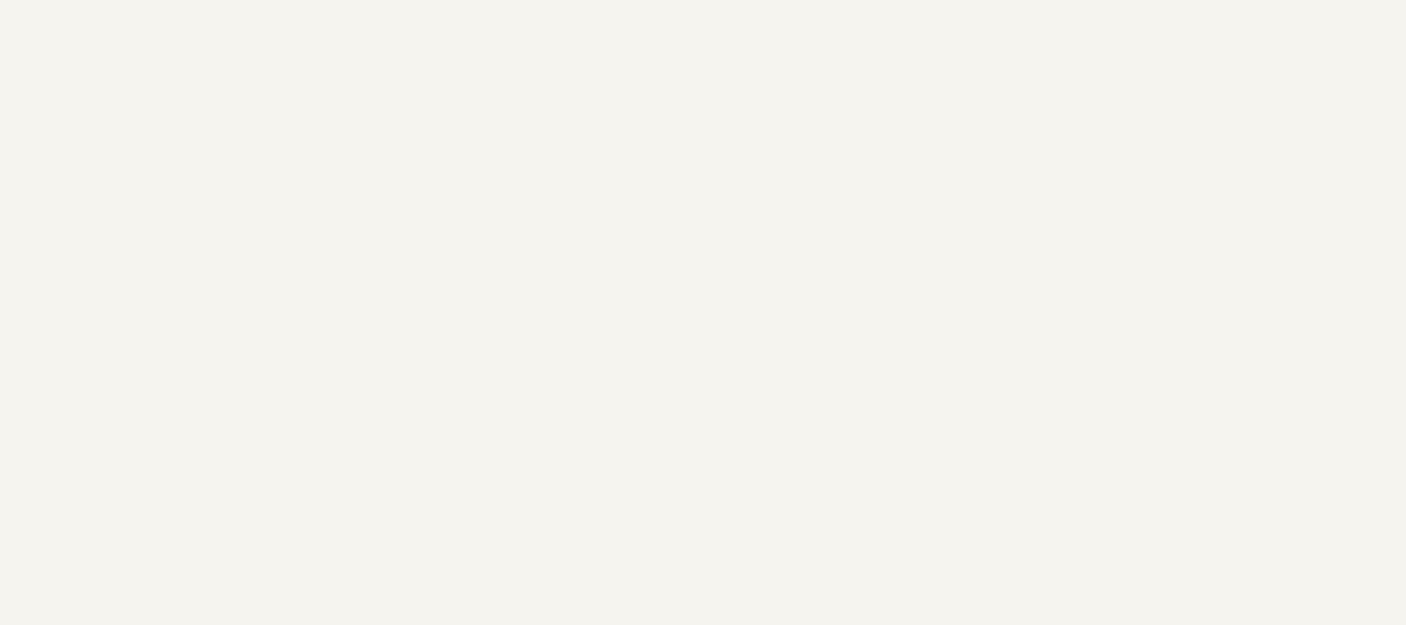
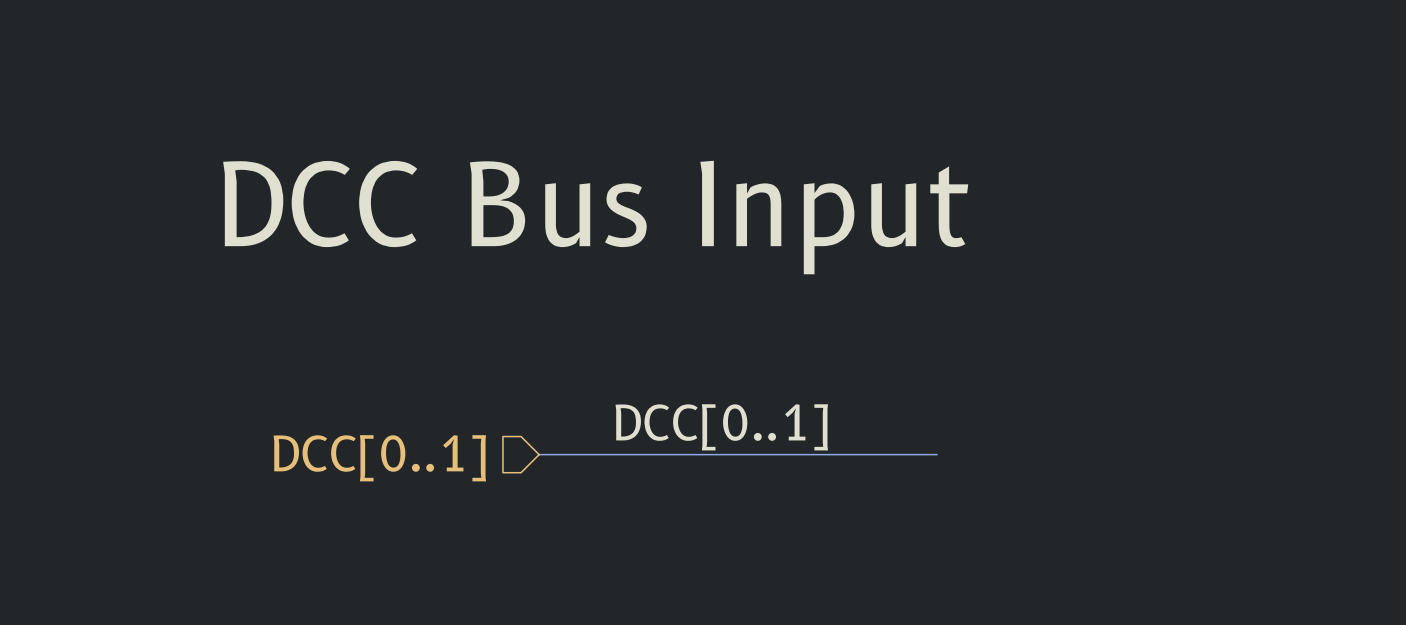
label: none -> DCC Bus Input (595, 217)
label: none -> DCC[0..1] (721, 427)
bus: none -> (539, 454) (936, 454)
hierarchical label: none -> DCC[0..1] (379, 458)

